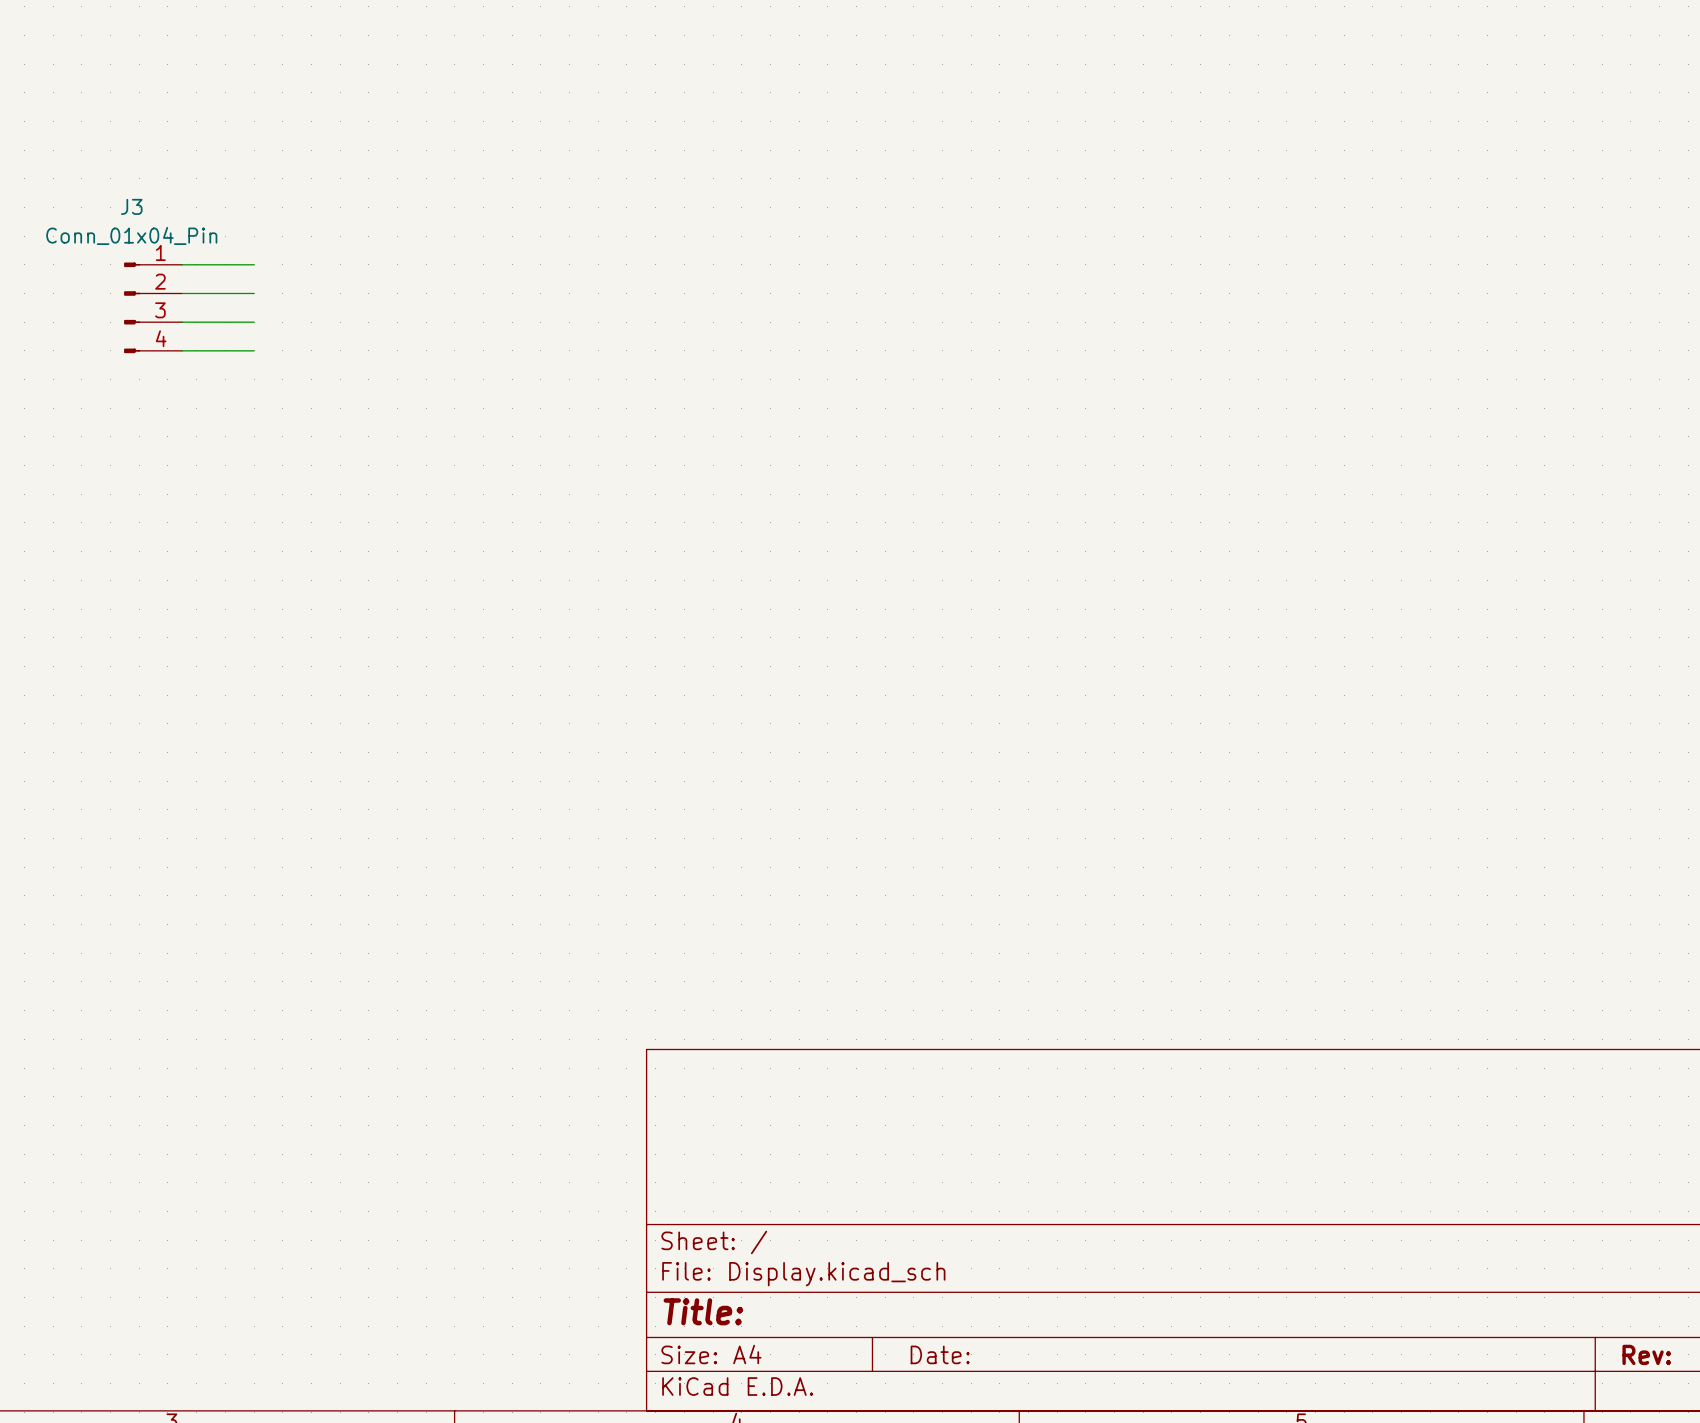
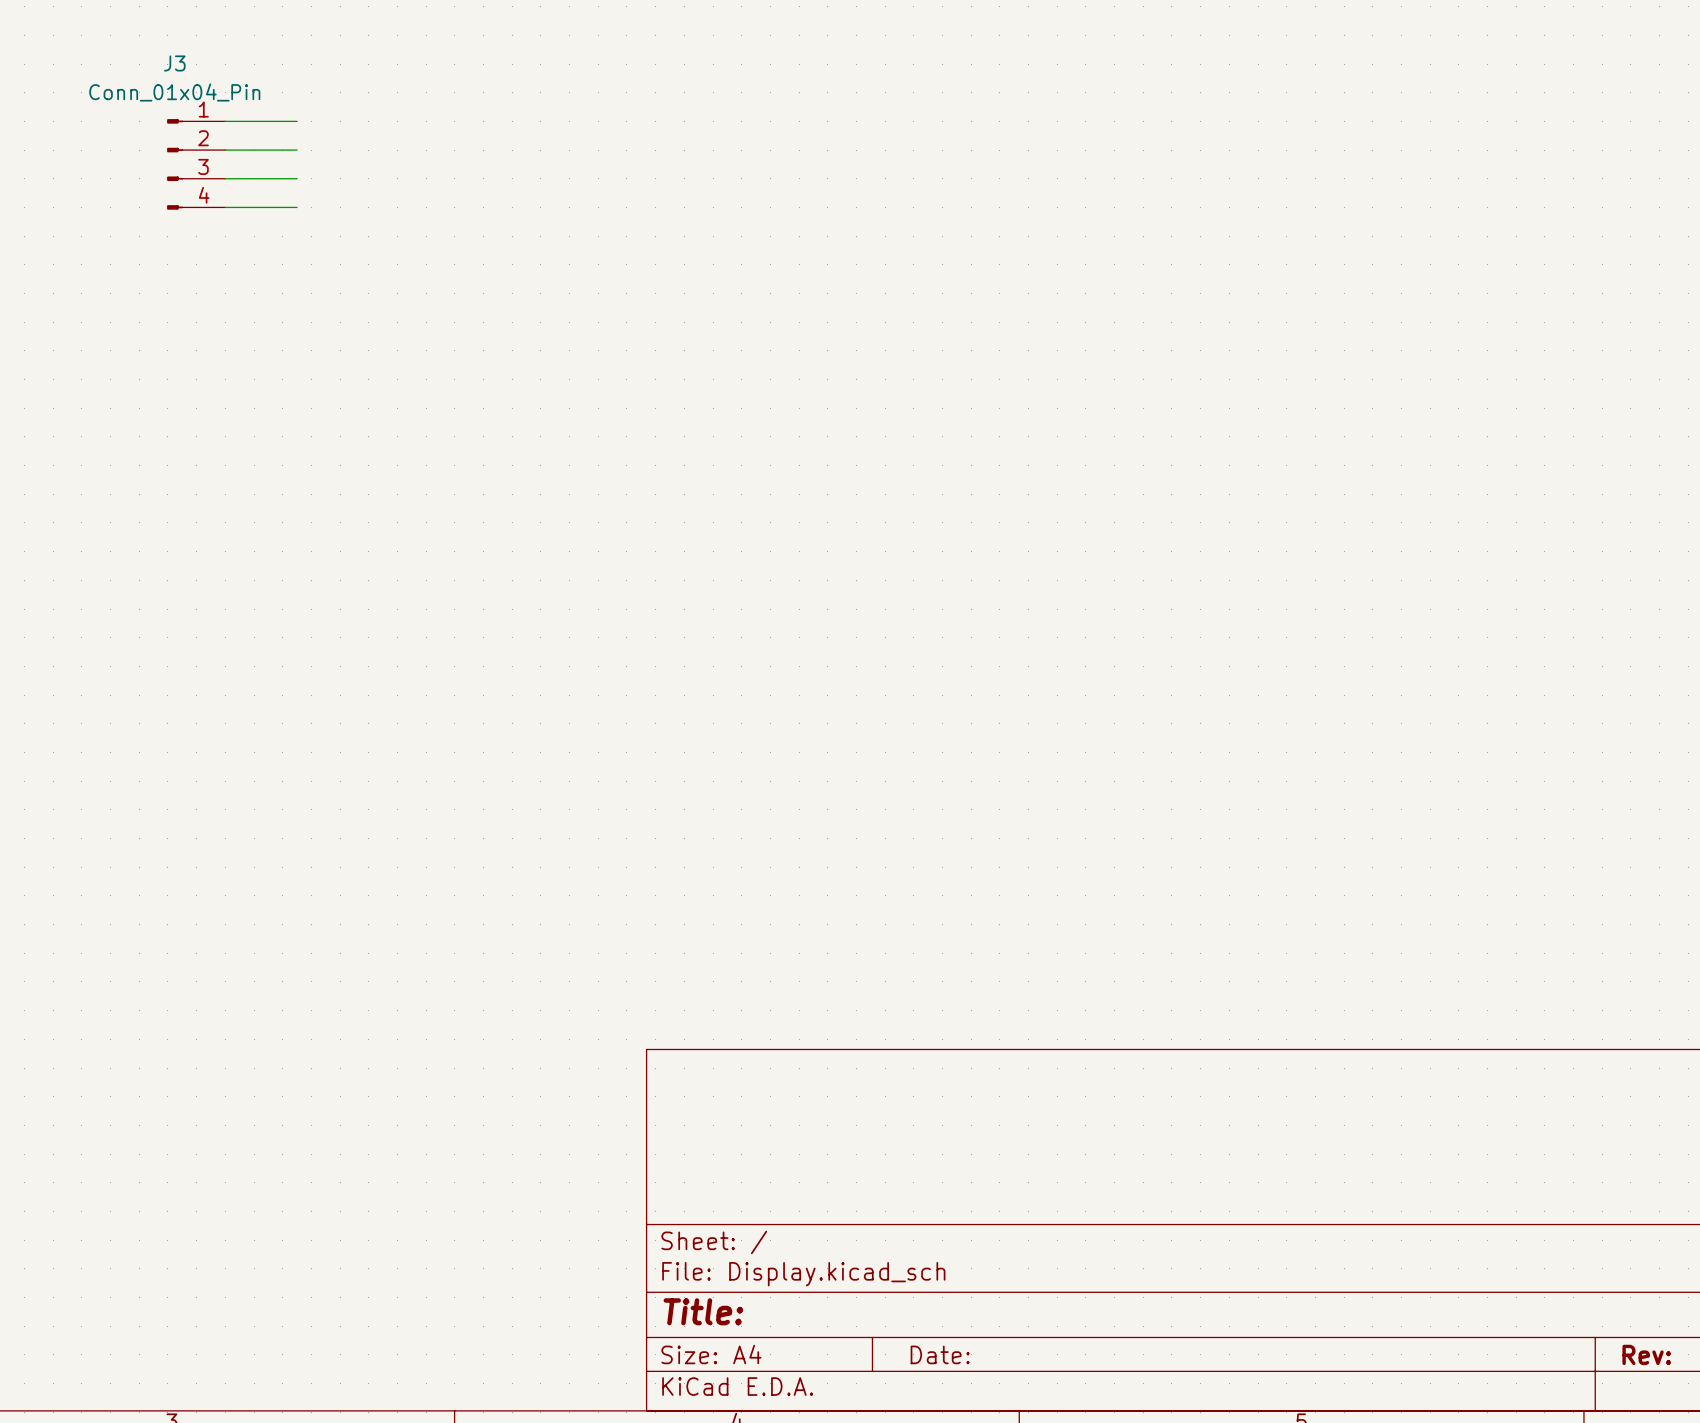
wire: (182, 264) (254, 264) -> (225, 121) (297, 121)
wire: (182, 293) (254, 293) -> (225, 150) (297, 150)
J3 position: (153, 307) -> (196, 164)
wire: (182, 322) (254, 322) -> (225, 178) (297, 178)
wire: (182, 350) (254, 350) -> (225, 207) (297, 207)

